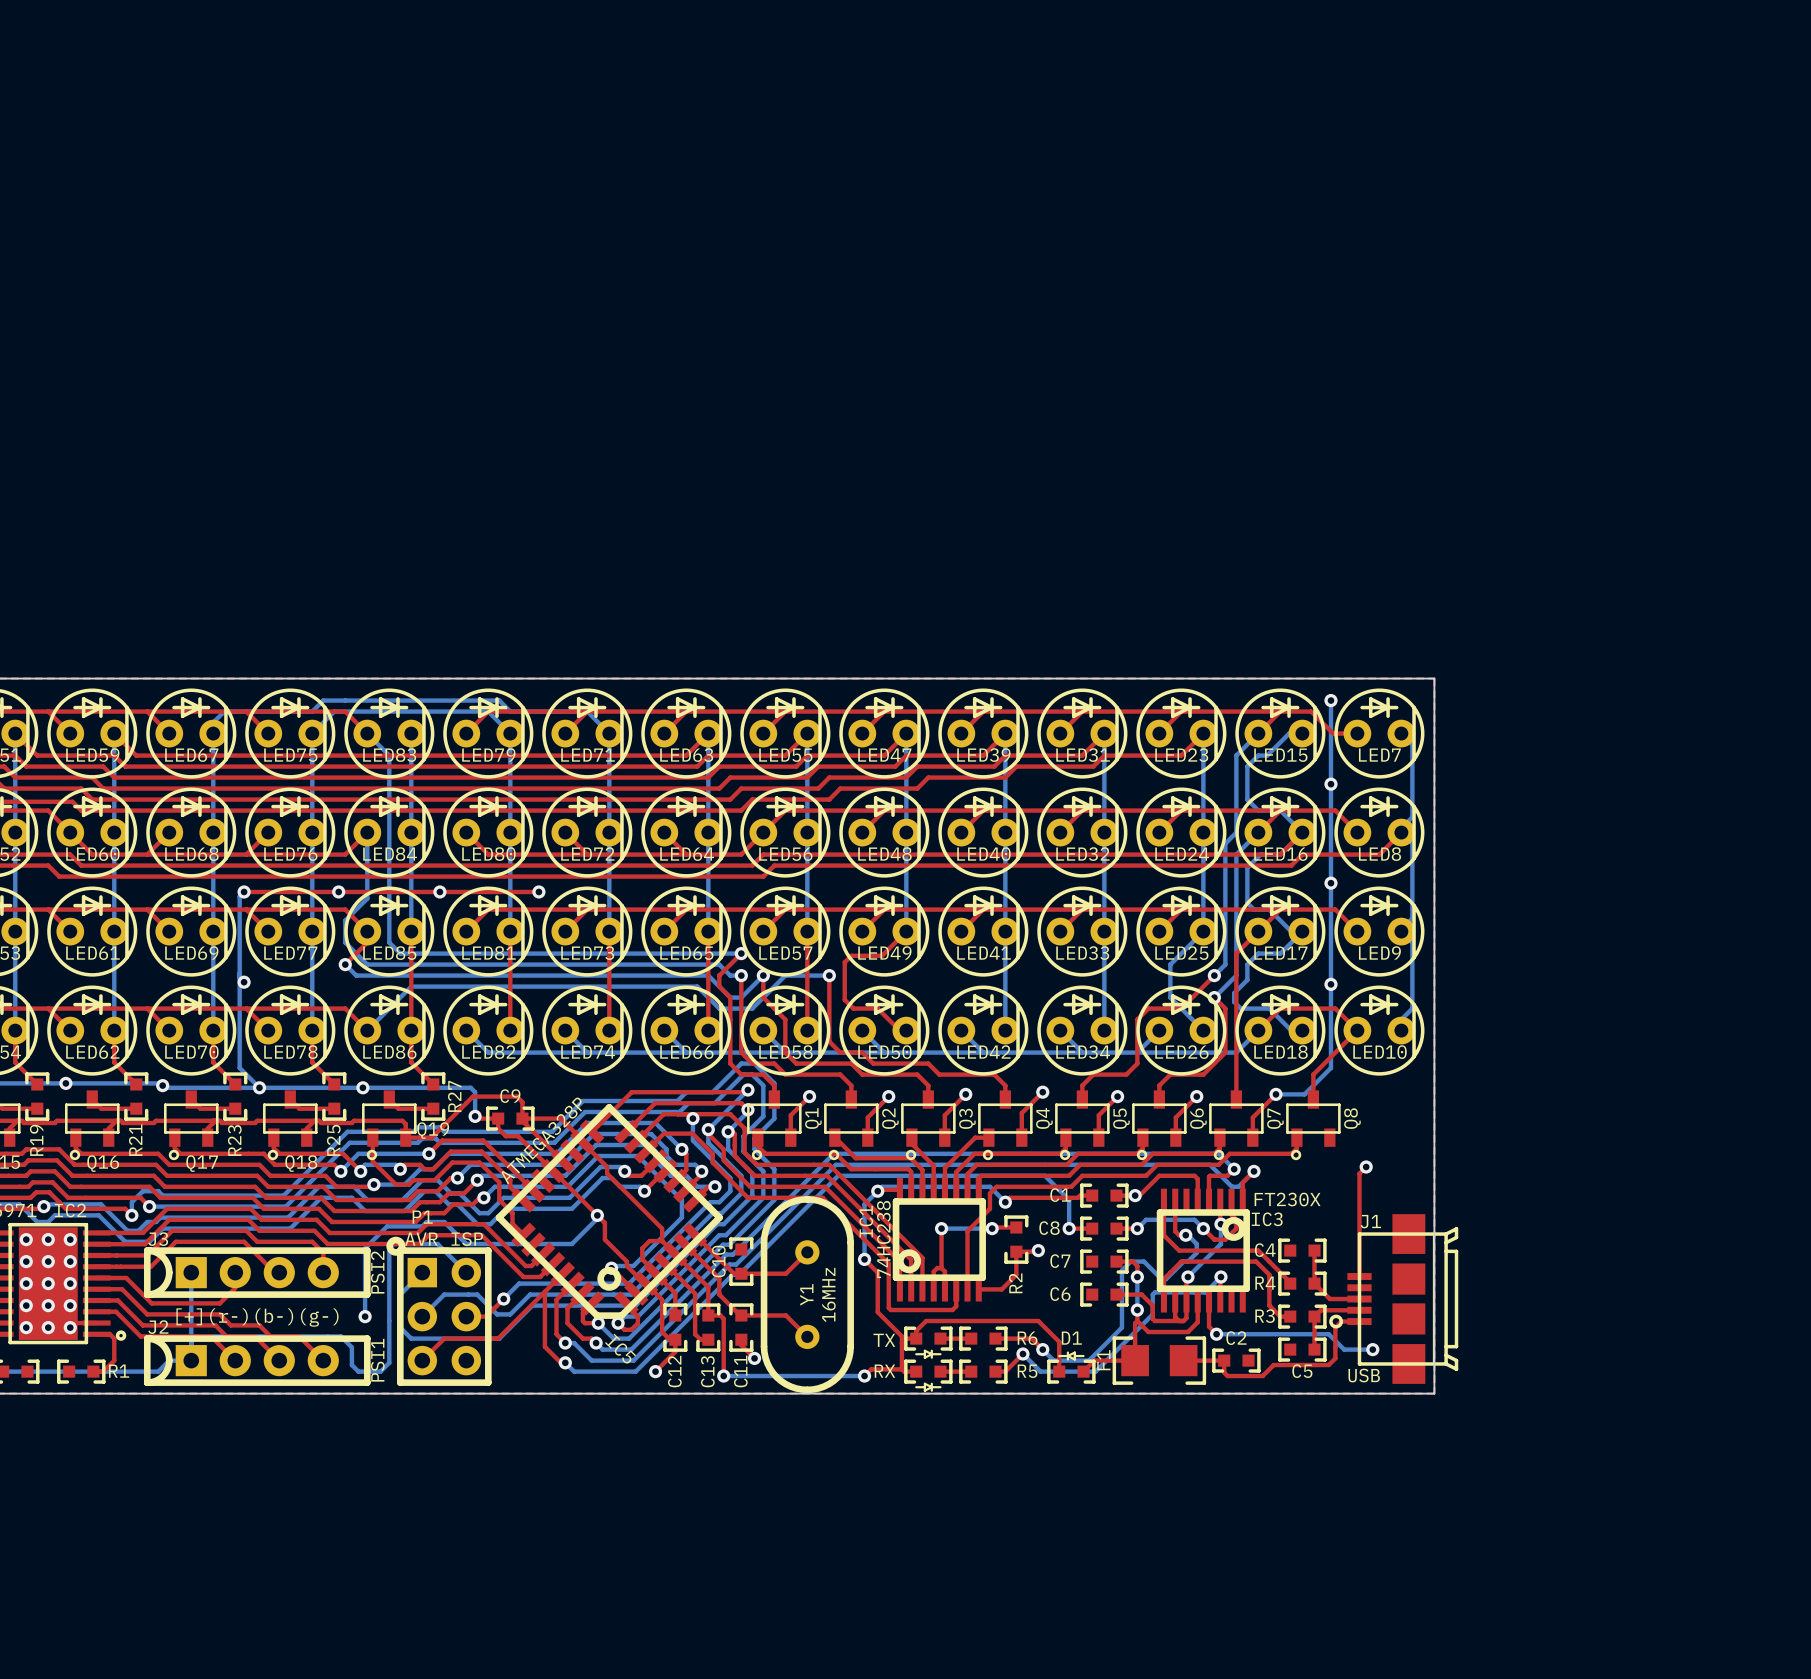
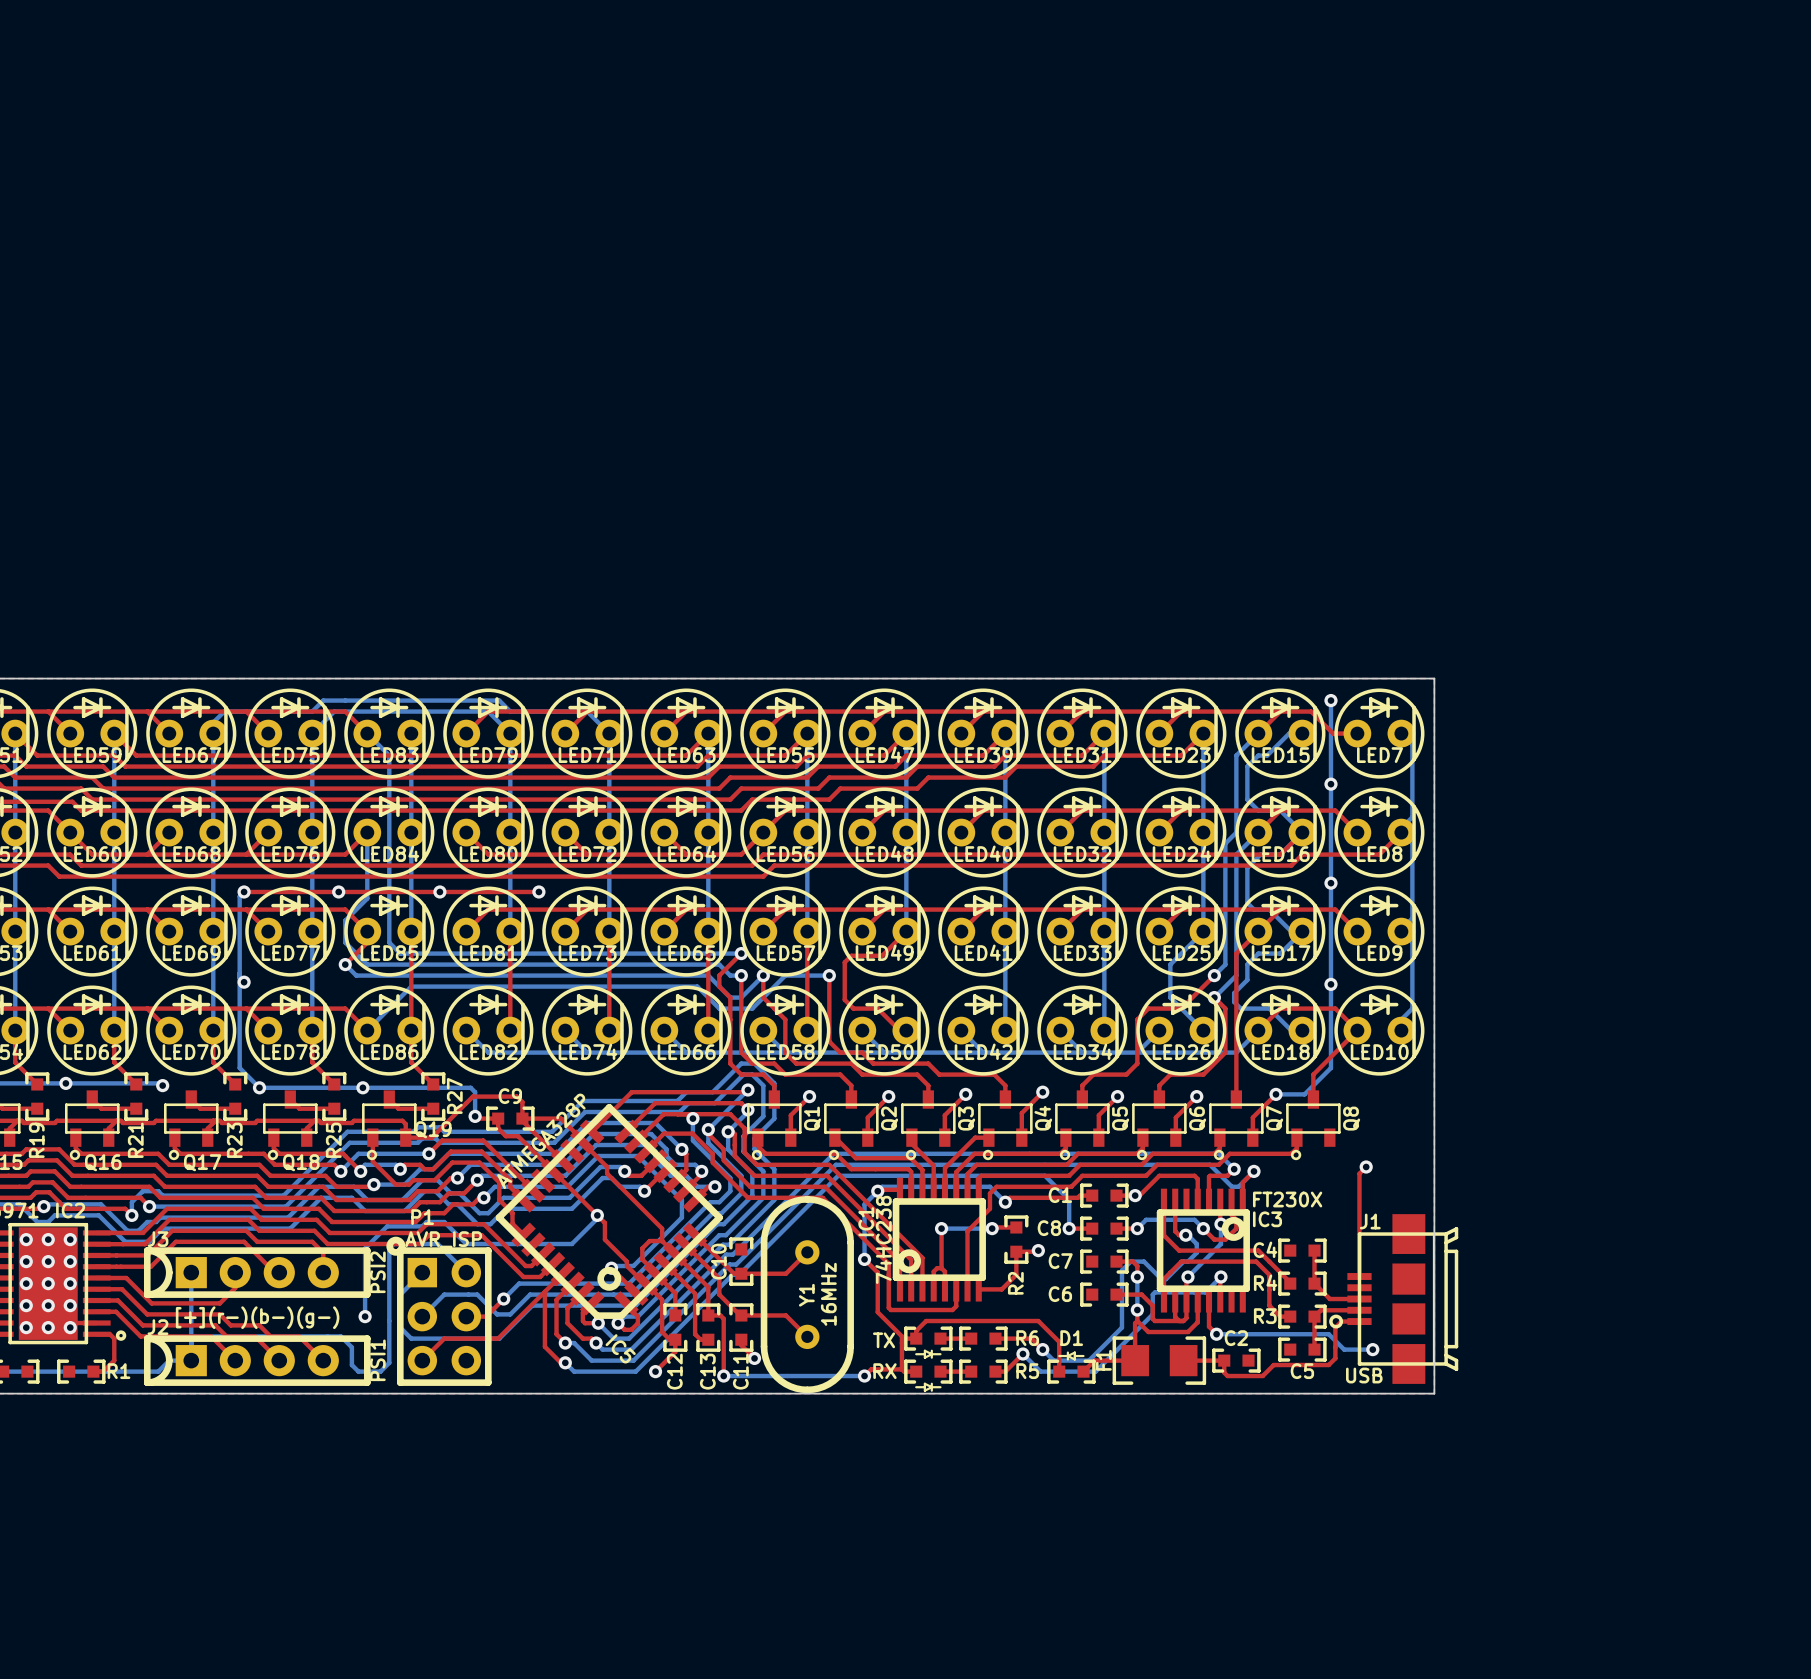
bottom track: (162, 1085) (164, 1087) (259, 1087) -> none

